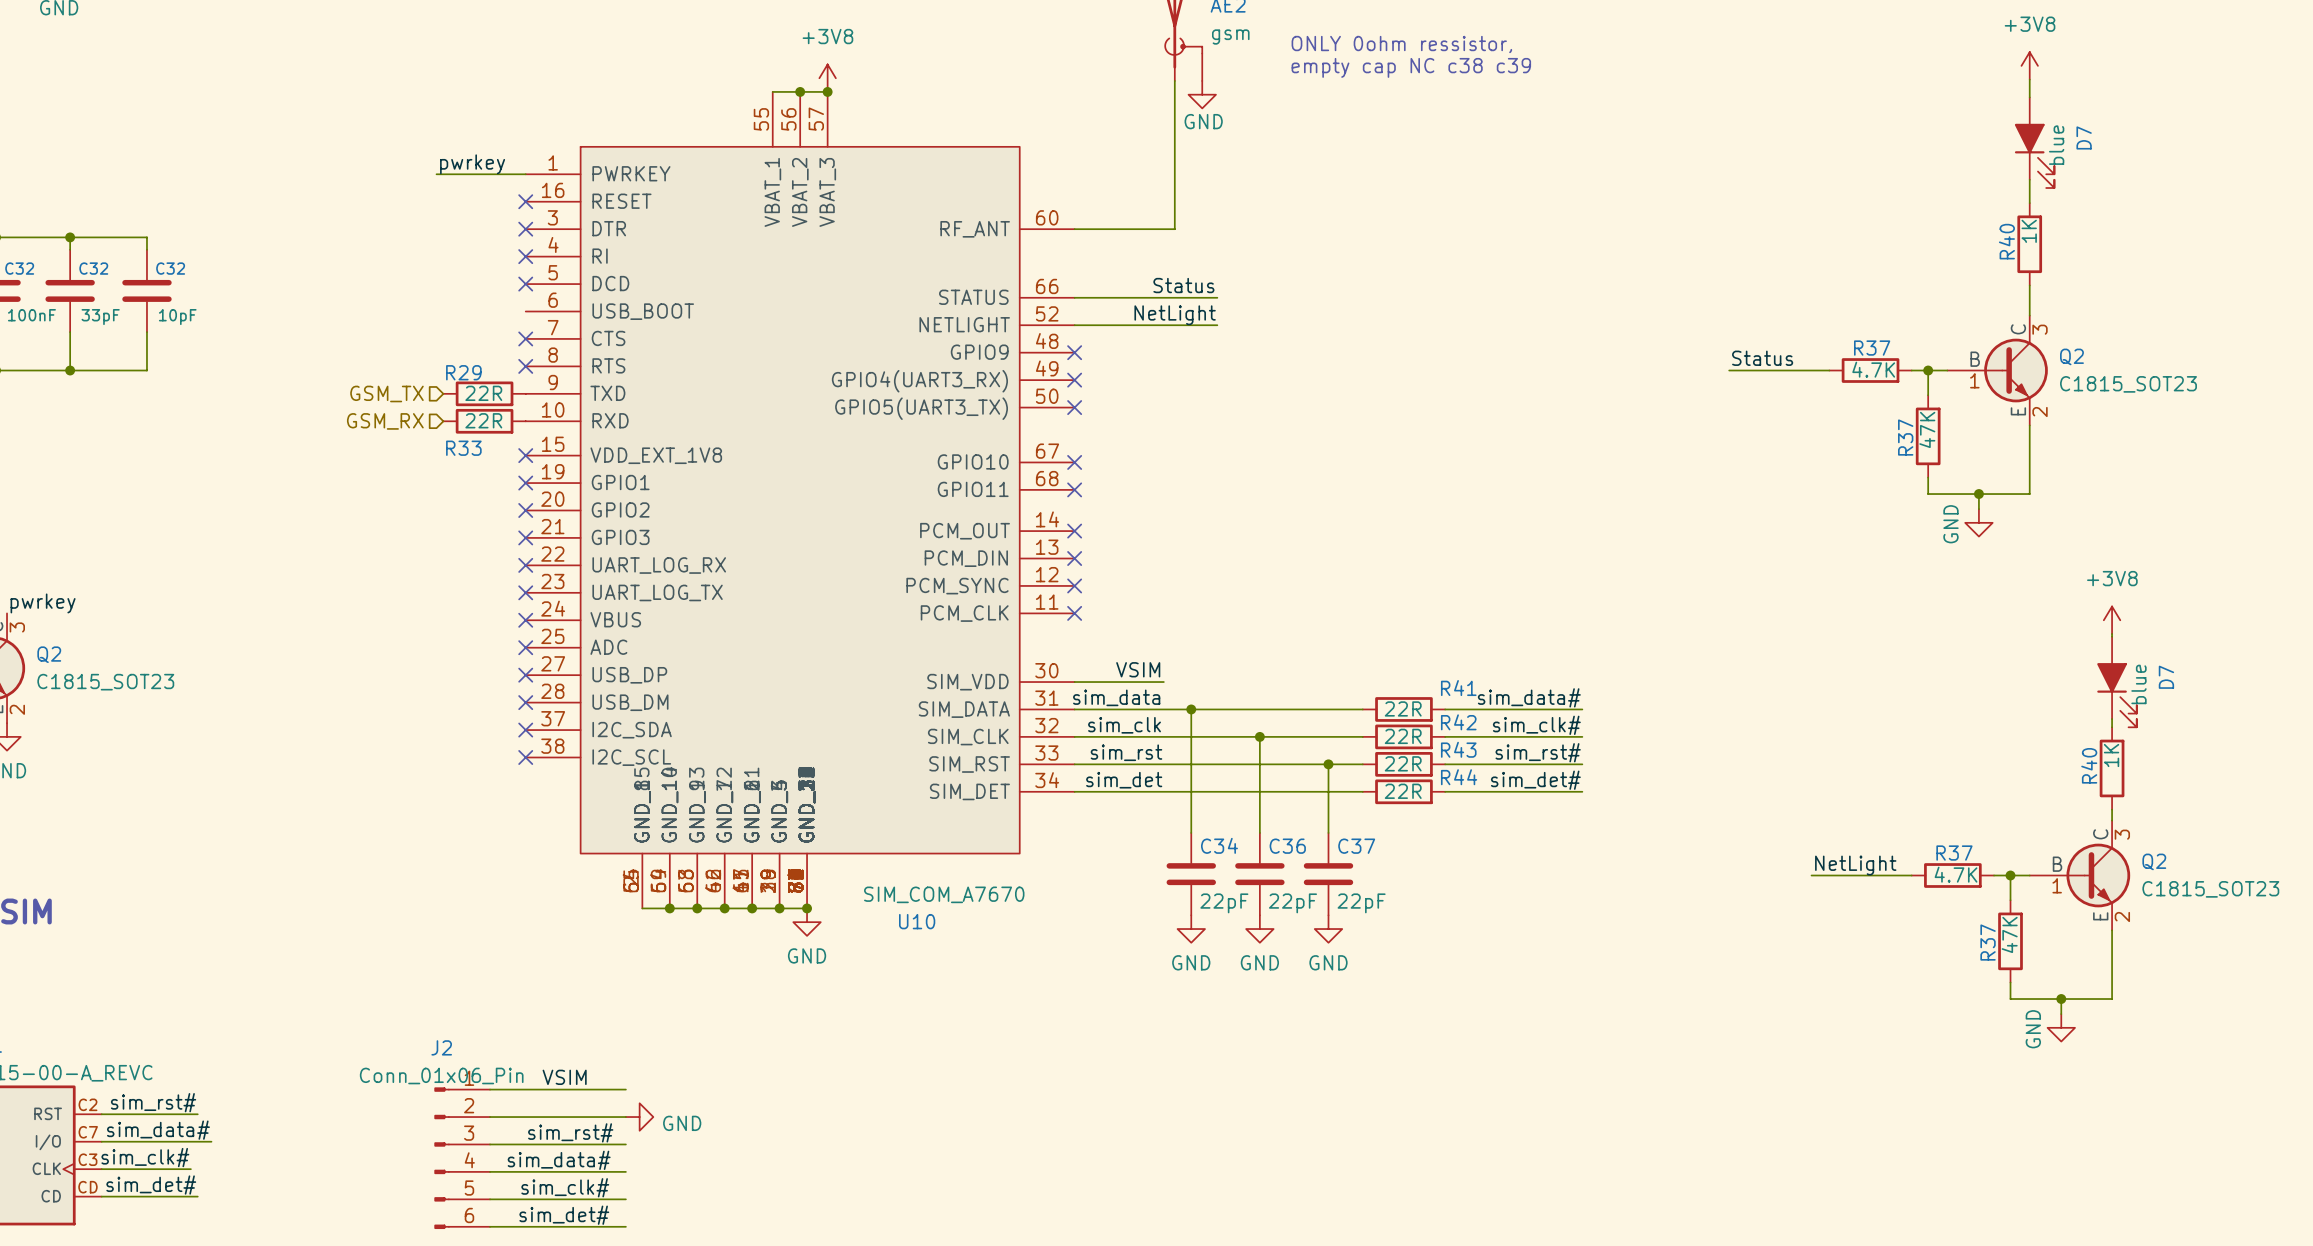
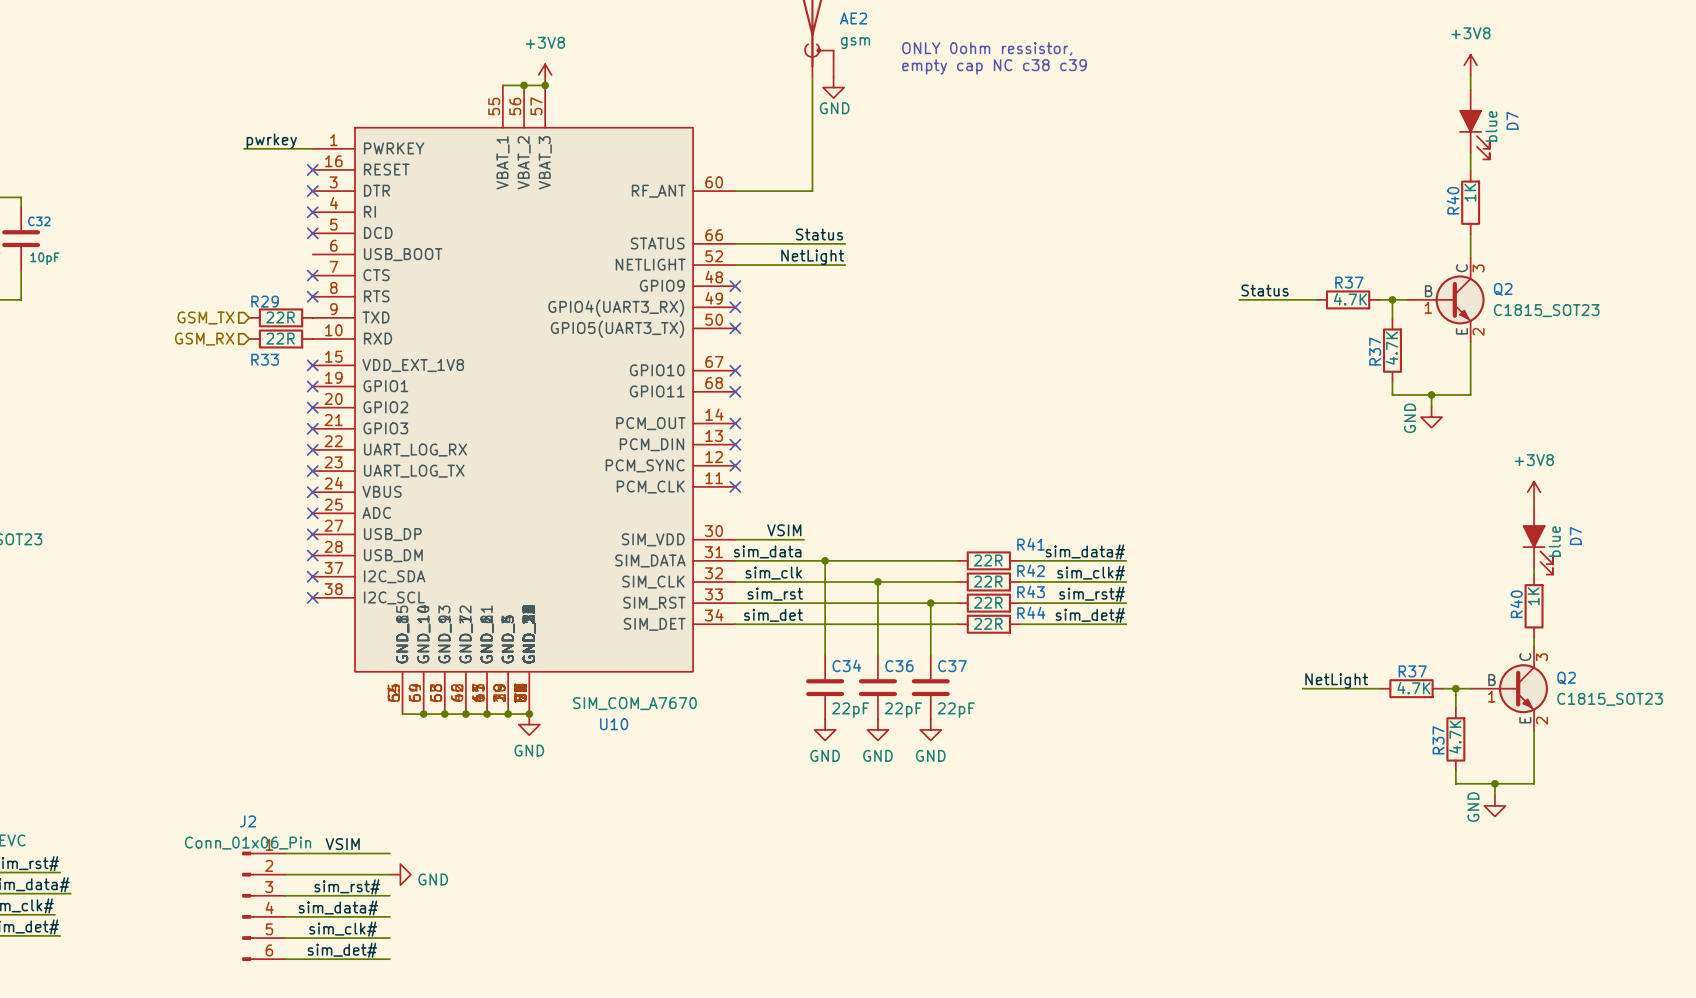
R37 value: 47K (1927, 429) -> 4.7K (1391, 348)
R37 value: 47K (2009, 934) -> 4.7K (1455, 736)

